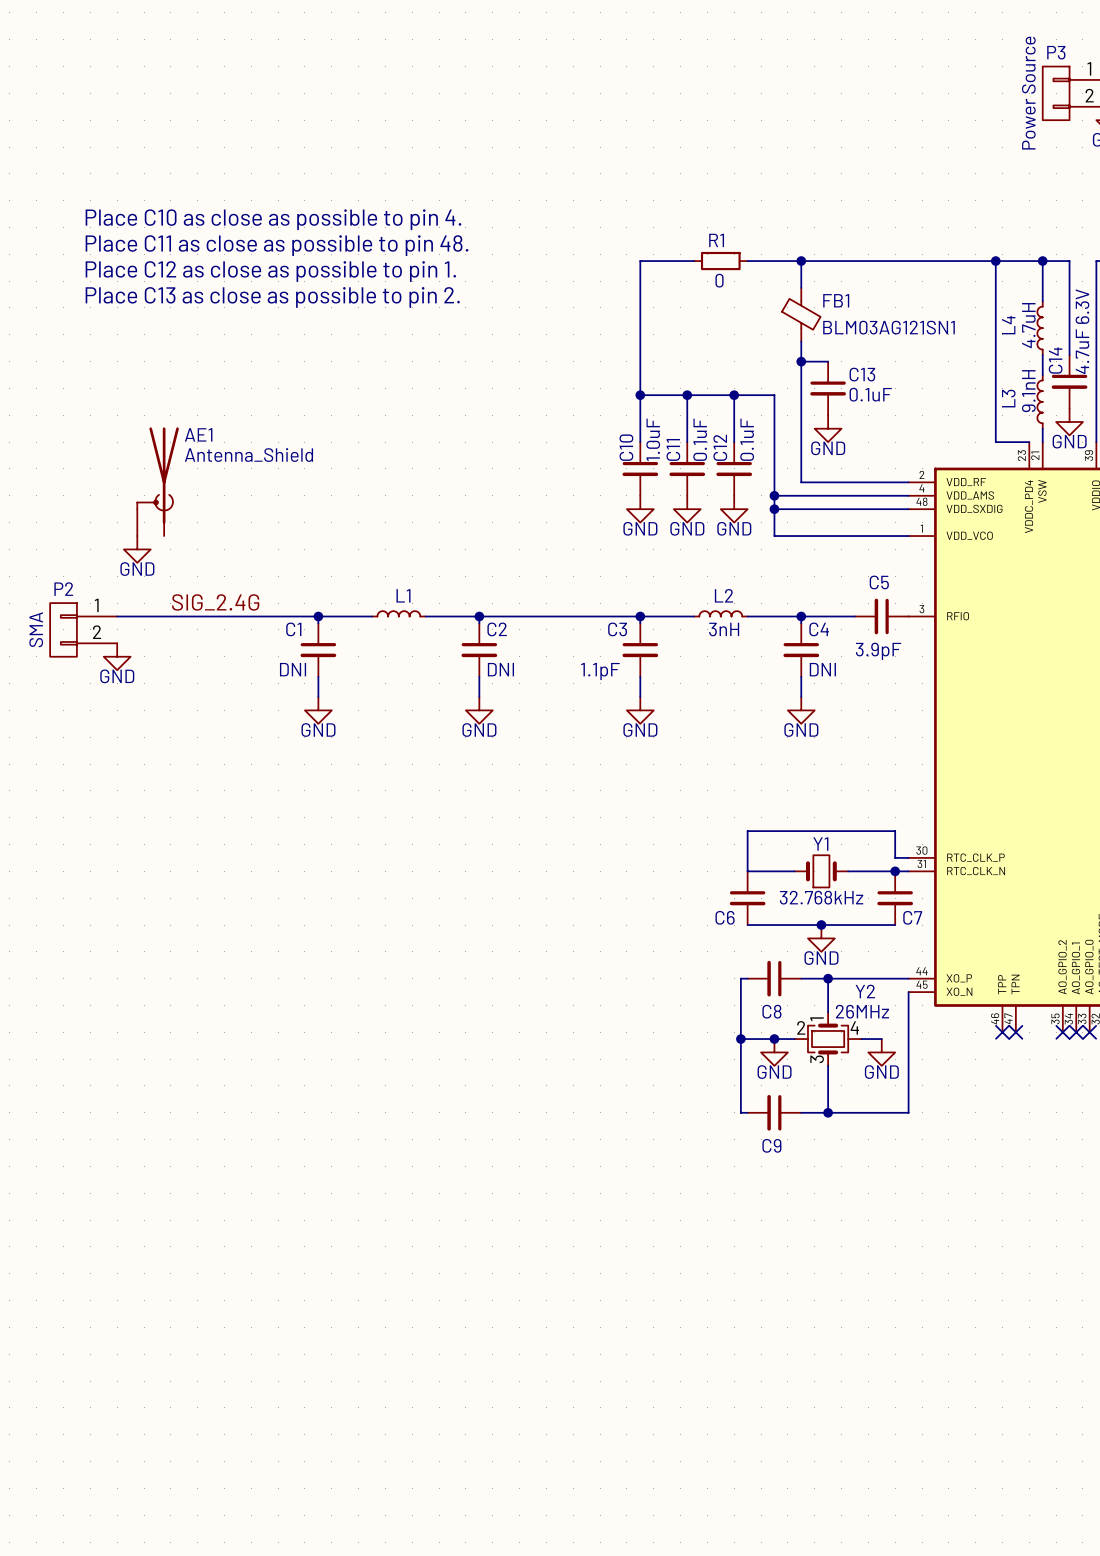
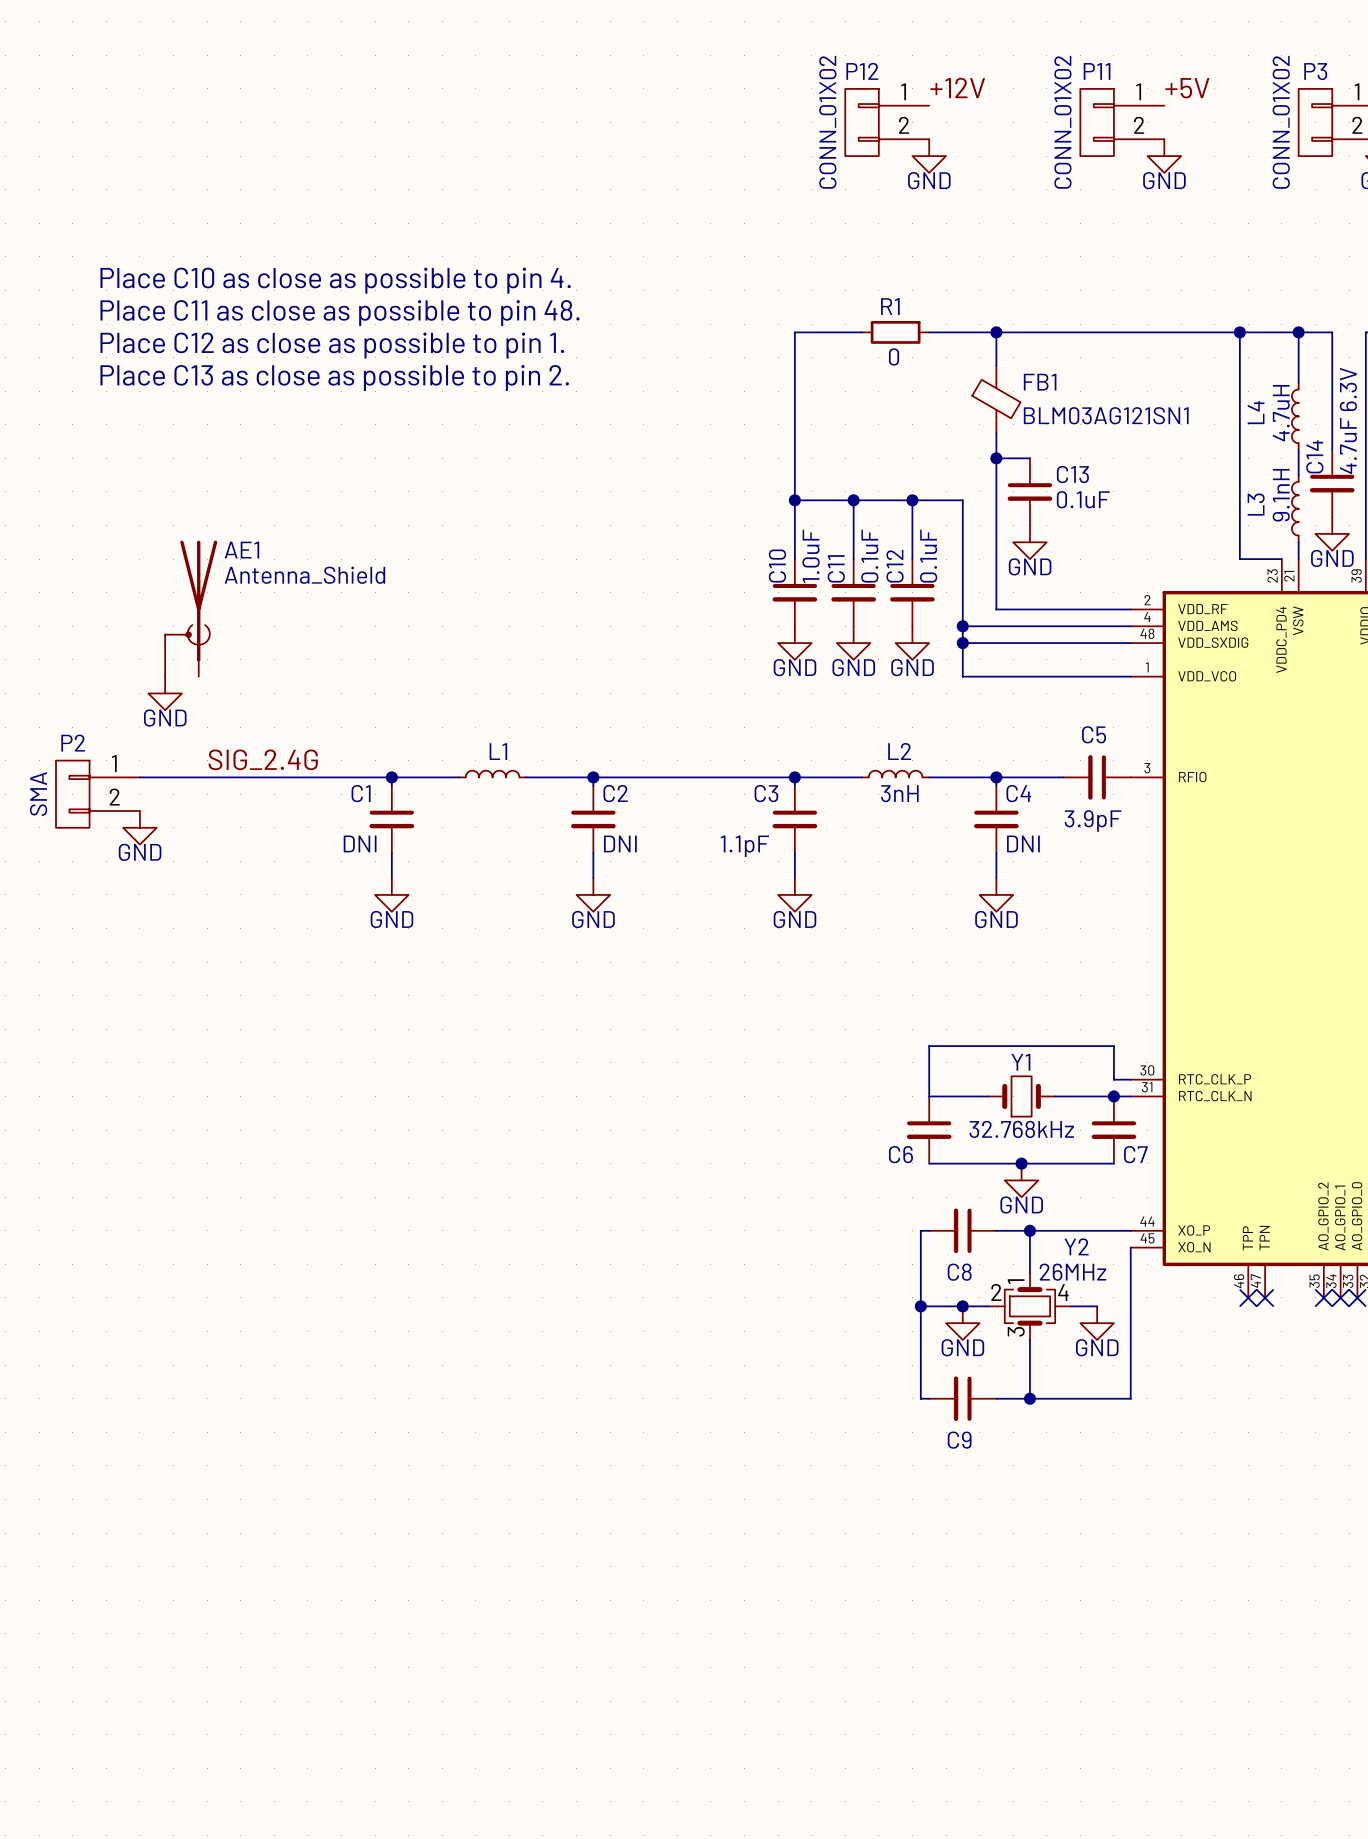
label: none -> +12V (957, 88)
label: none -> +5V (1187, 88)
P12: none -> CONN_01X02 (887, 122)
P11: none -> CONN_01X02 (1122, 122)
P3 value: Power Source (1028, 93) -> CONN_01X02 (1281, 122)
power symbol: none -> GND (929, 156)
power symbol: none -> GND (1164, 156)

